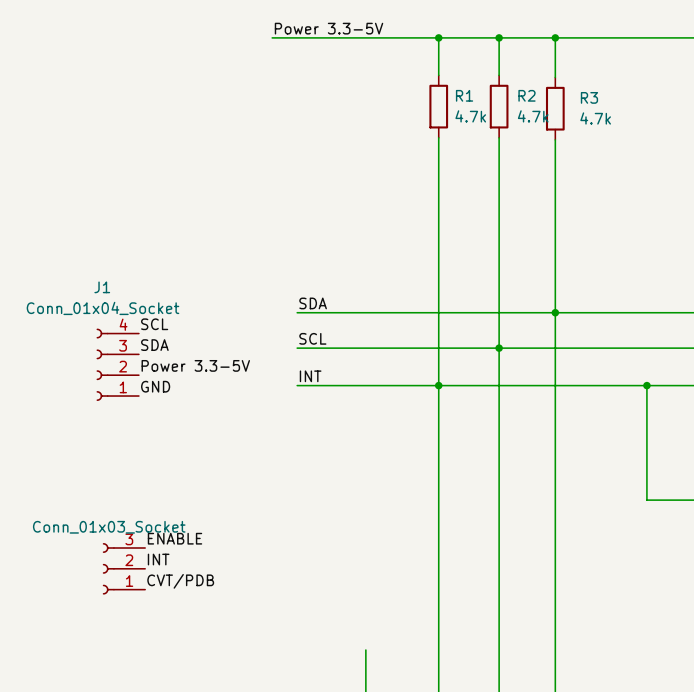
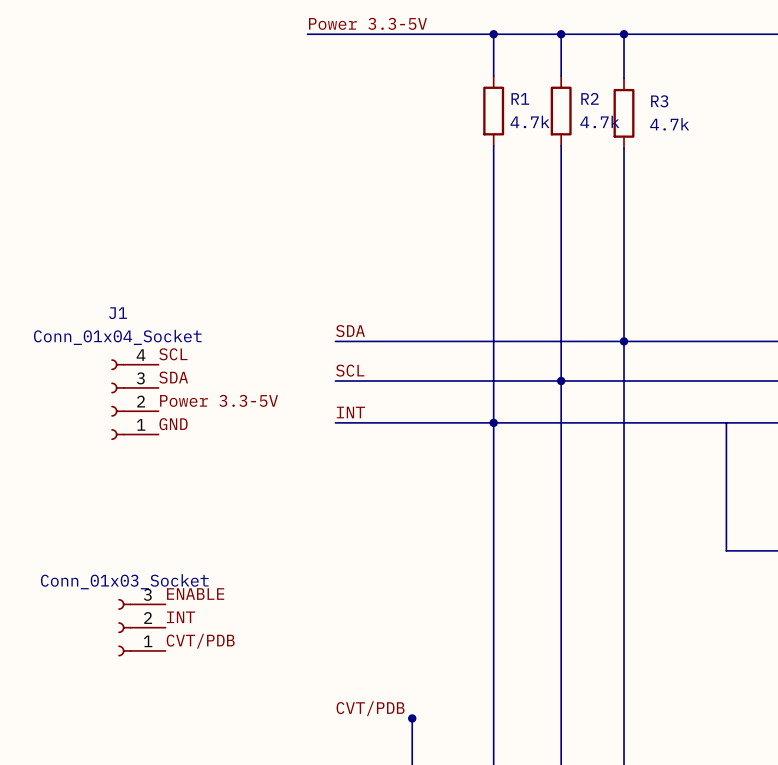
junction: (646, 385) -> none
label: none -> CVT/PDB (370, 708)
junction: none -> (412, 718)

